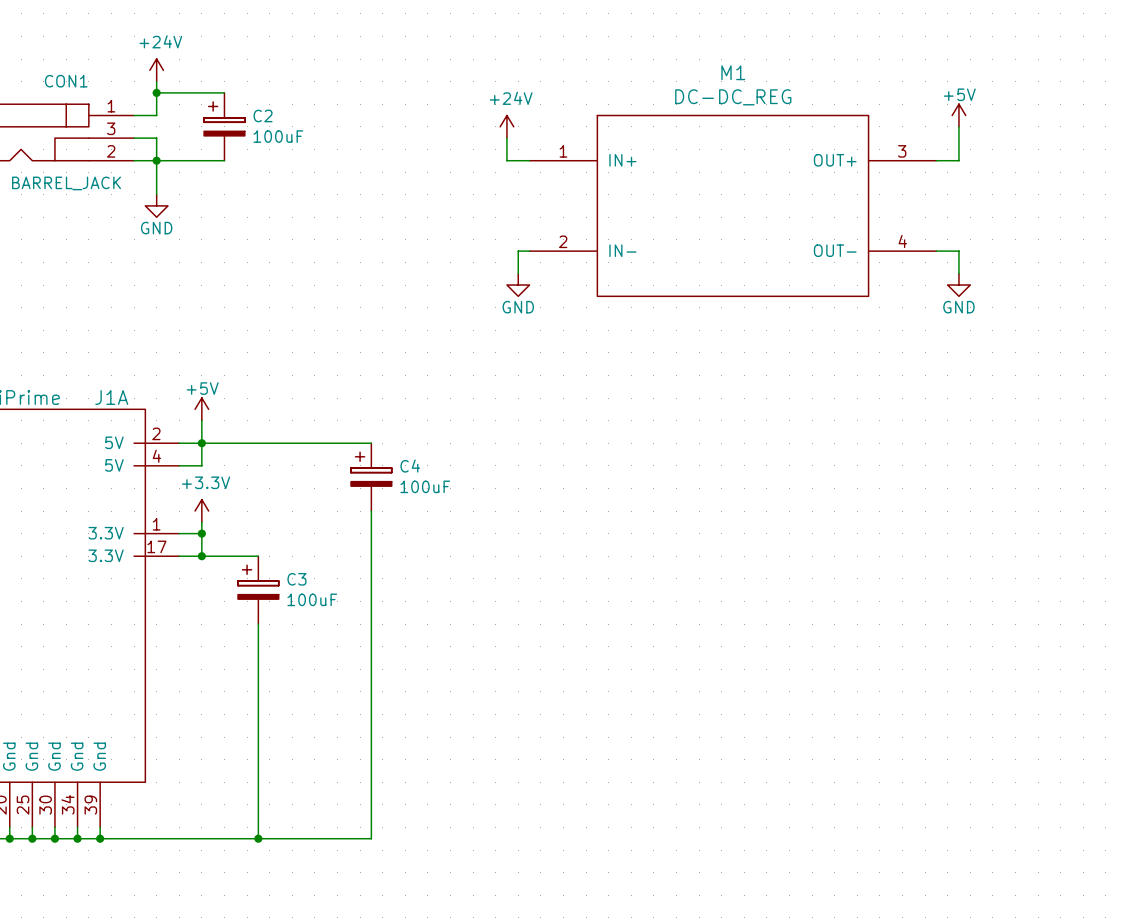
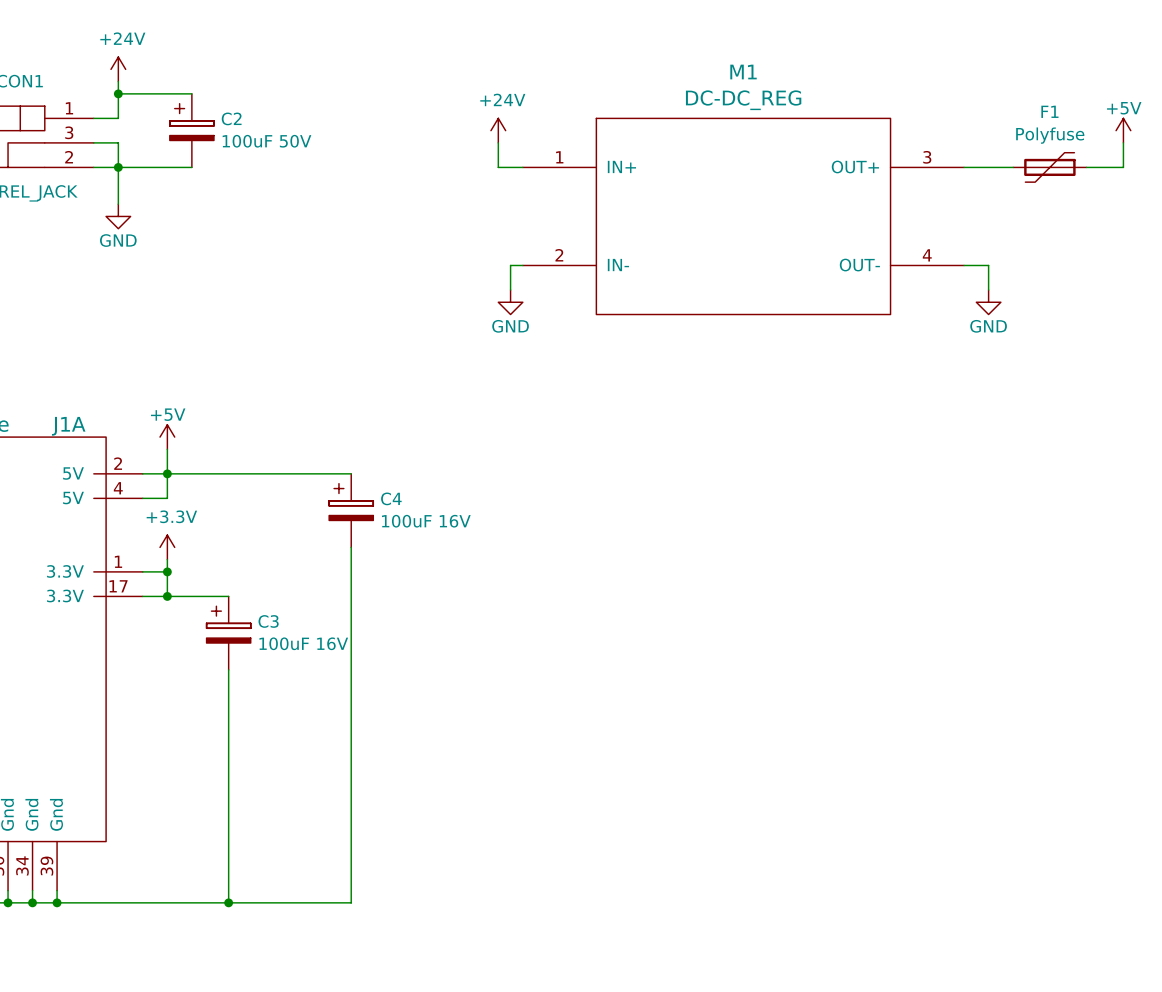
power symbol position: +5V (958, 115) -> +5V (1123, 130)
wire: (958, 126) (958, 160) -> (1013, 167) (988, 167)
C2 value: 100uF (278, 136) -> 100uF 50V (266, 141)
wire: none -> (1123, 142) (1123, 167) (1086, 167)
F1: none -> Polyfuse (1049, 167)
C4 value: 100uF (425, 486) -> 100uF 16V (426, 521)
C3 value: 100uF (312, 599) -> 100uF 16V (303, 643)

